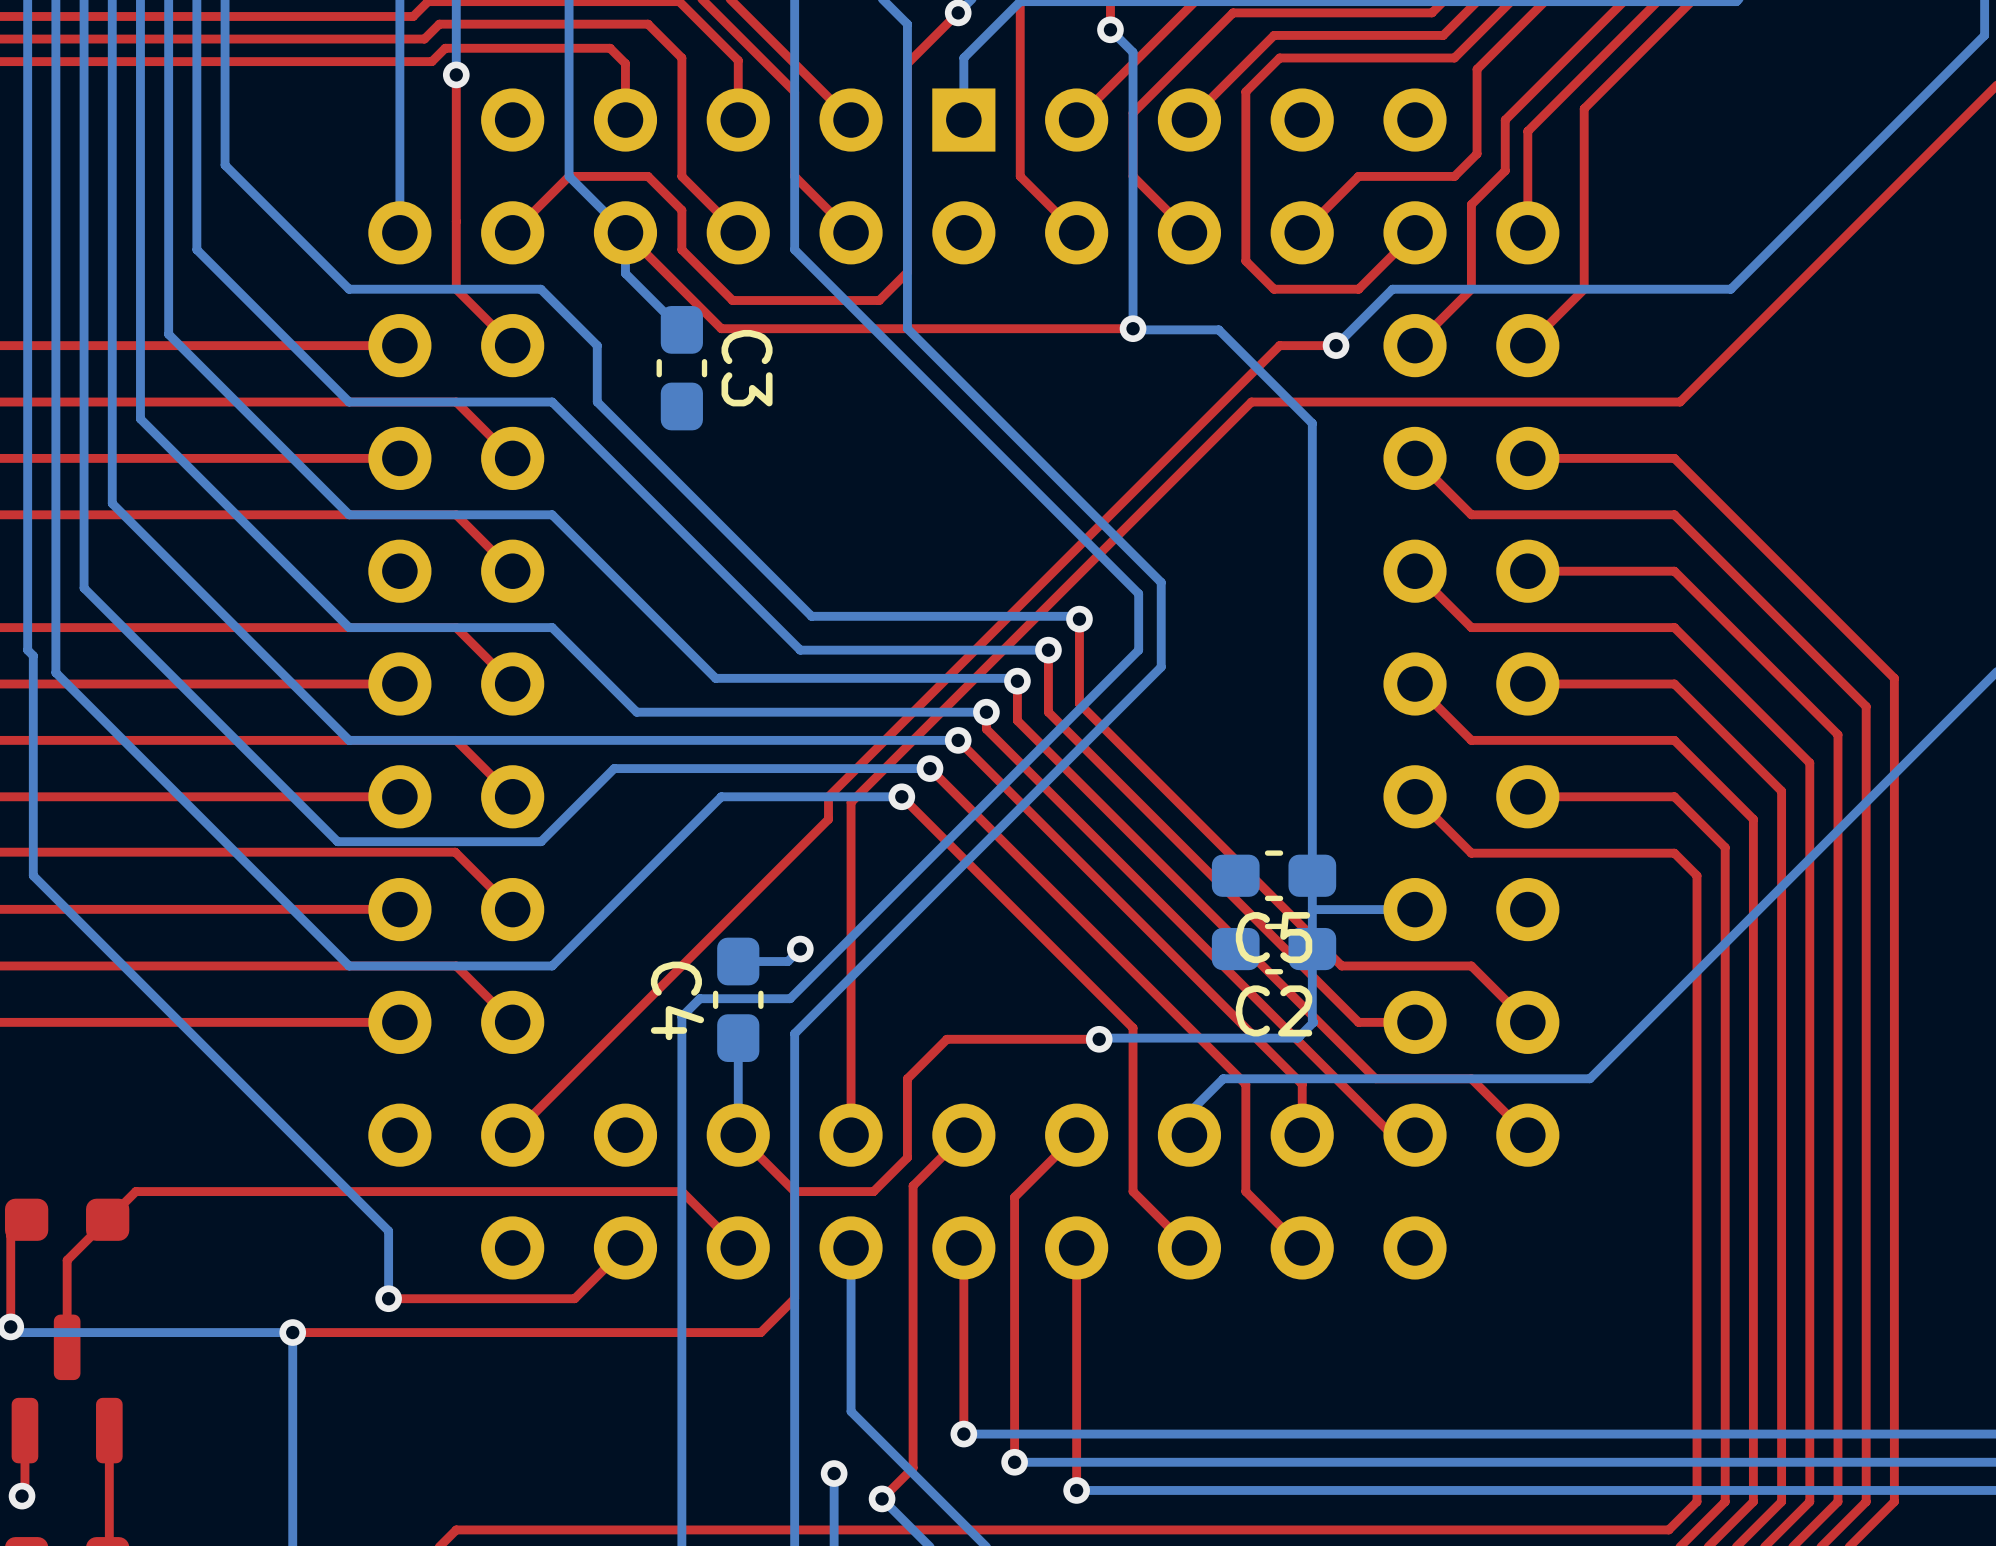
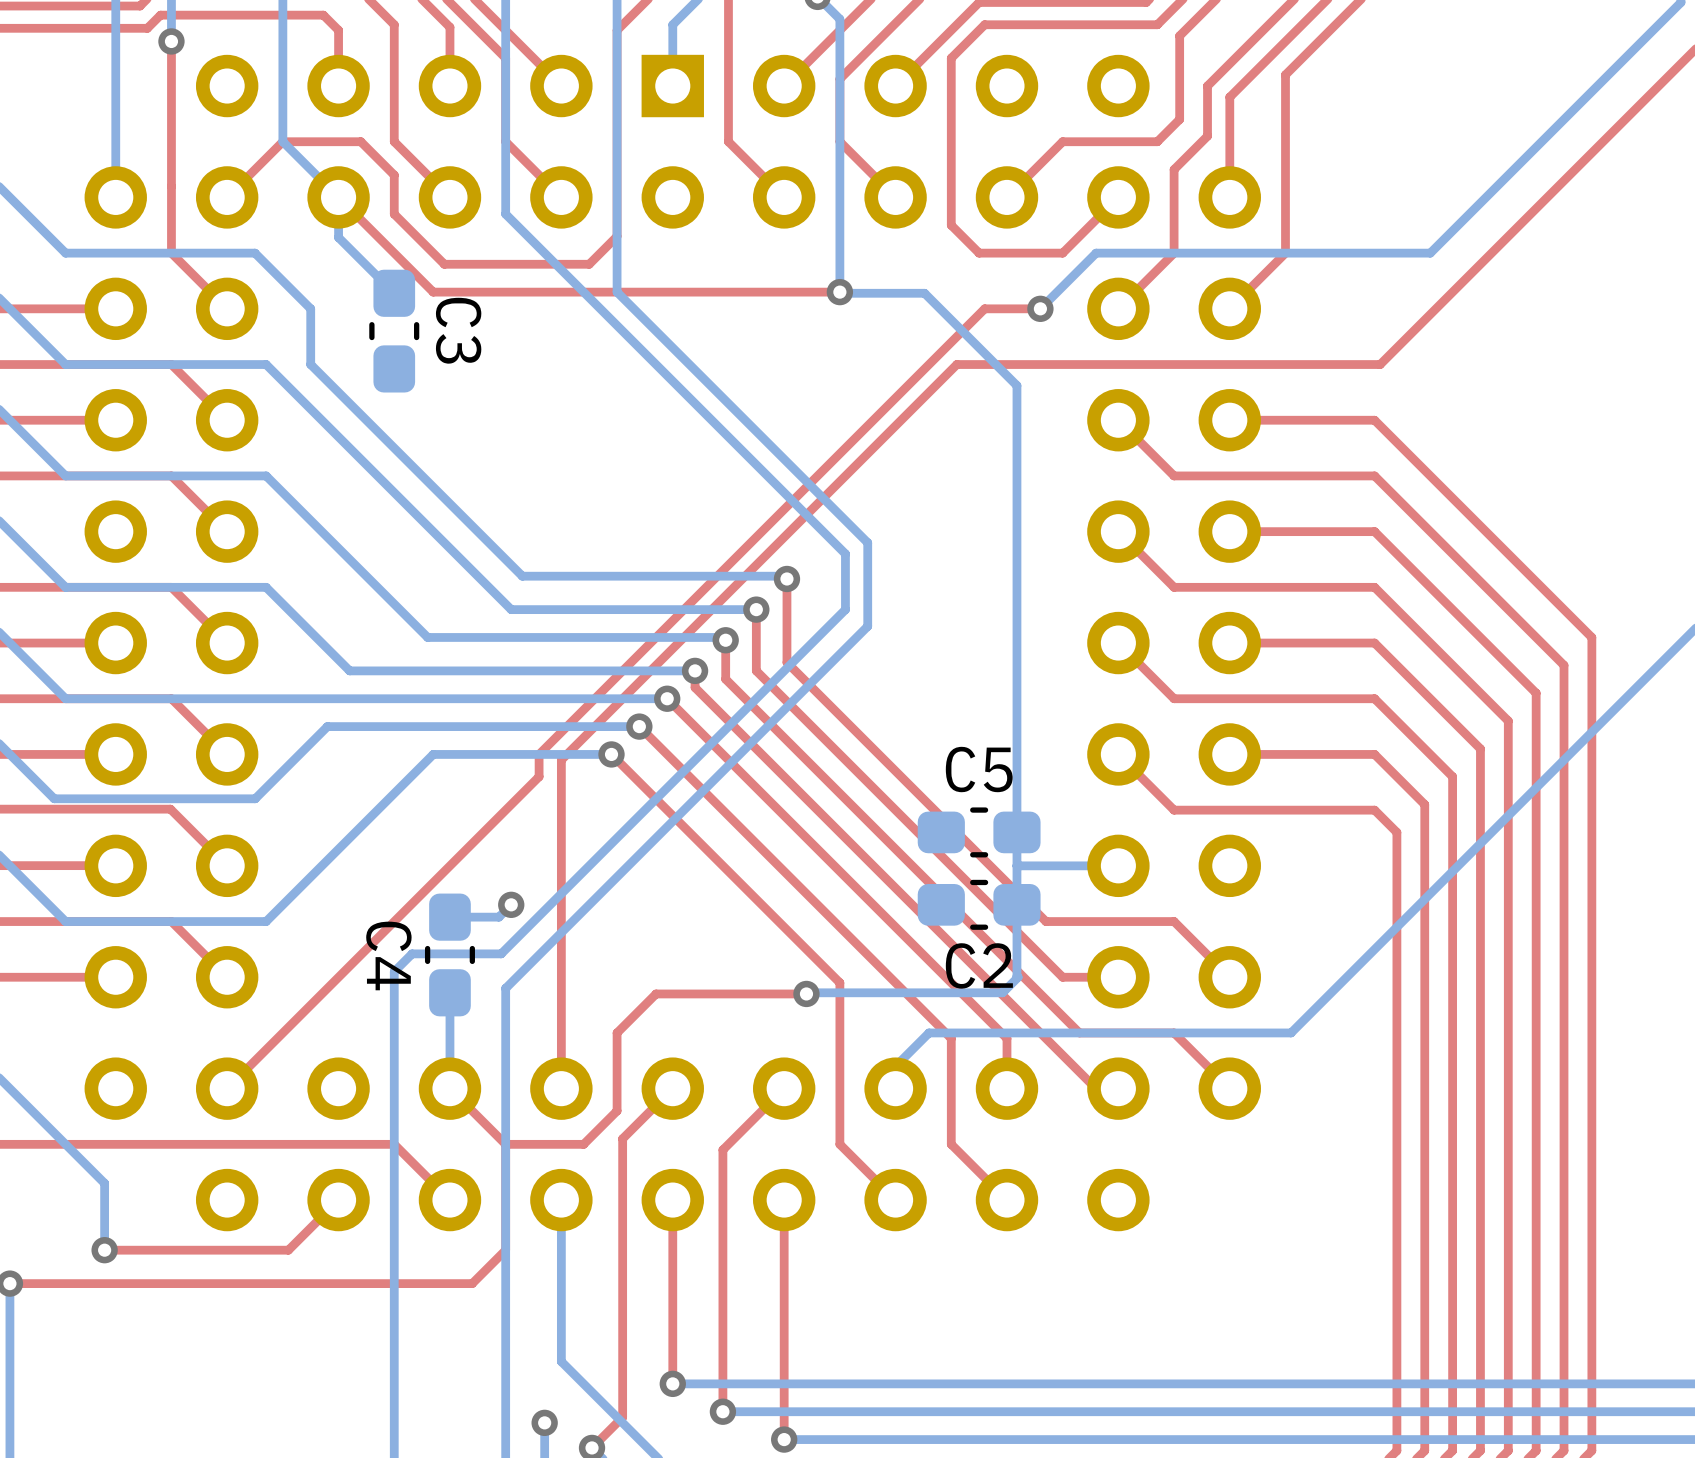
C5 name position: C5 (1274, 937) -> C5 (979, 769)

